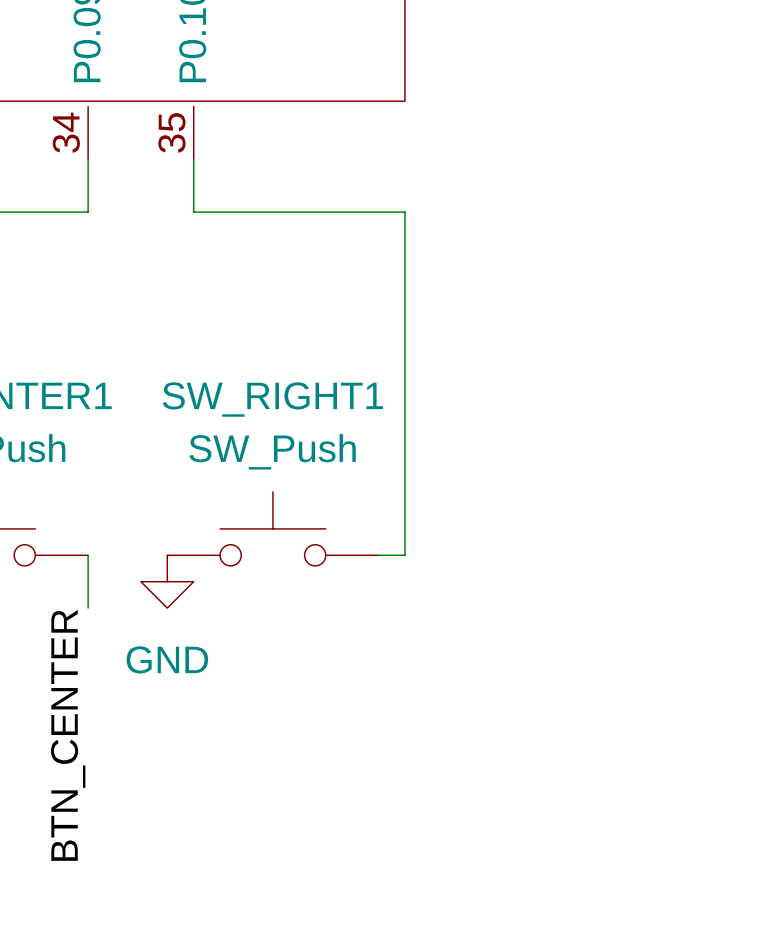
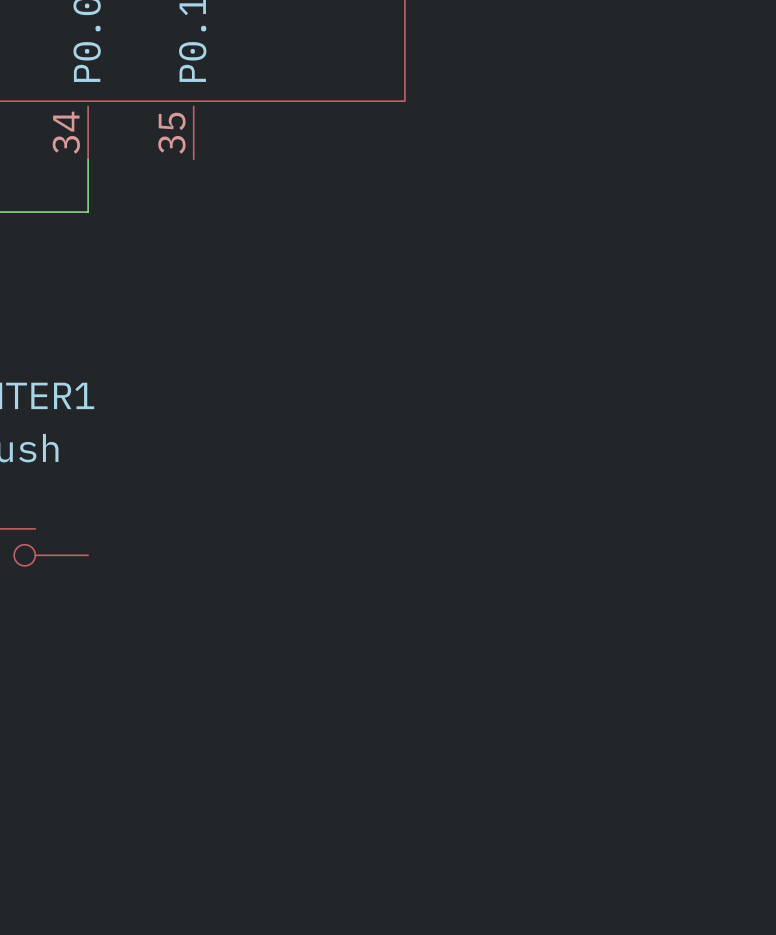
wire: (193, 159) (193, 212) (404, 212) (404, 555) (378, 555) -> none
SW_RIGHT1: SW_Push (272, 528) -> none
wire: (88, 555) (88, 608) -> none
power symbol: GND (167, 581) -> none
label: BTN_CENTER (68, 735) -> none

